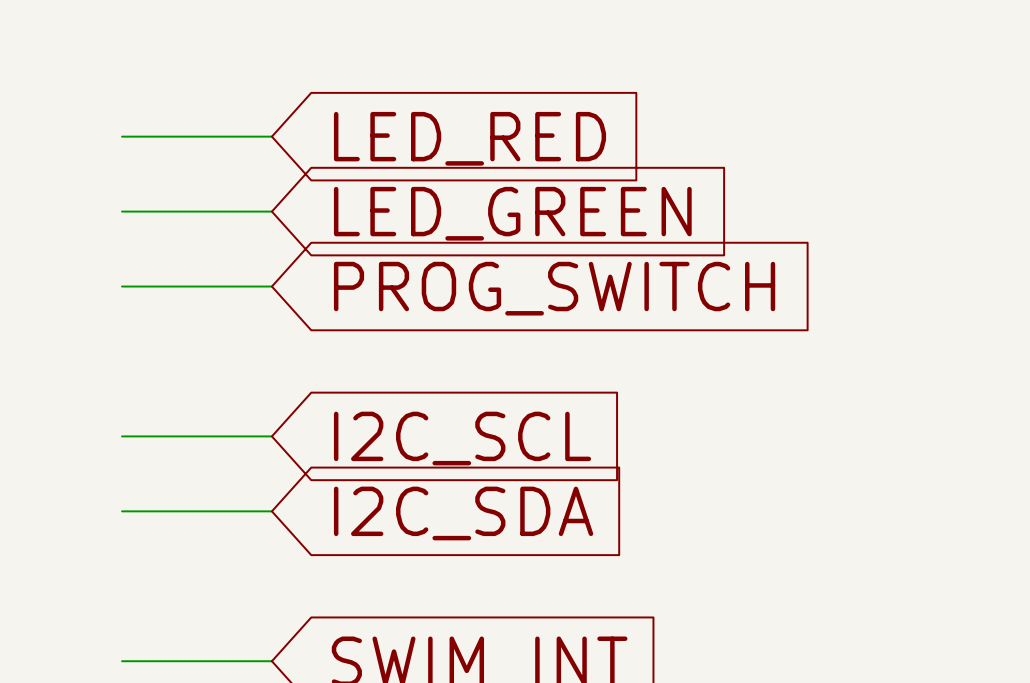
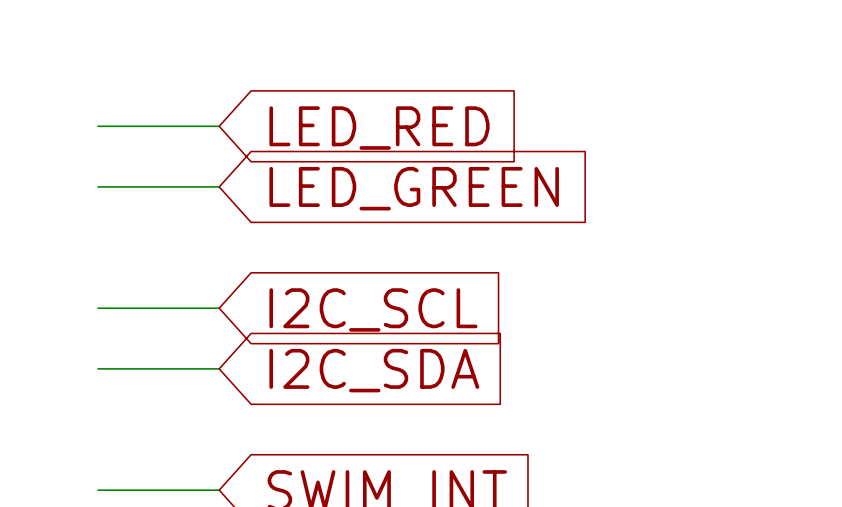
wire: (122, 136) (271, 136) -> none
global label: LED_RED (469, 138) -> none
global label: LED_GREEN (512, 213) -> LED_RED (379, 128)
global label: PROG_SWITCH (554, 288) -> LED_GREEN (414, 188)

